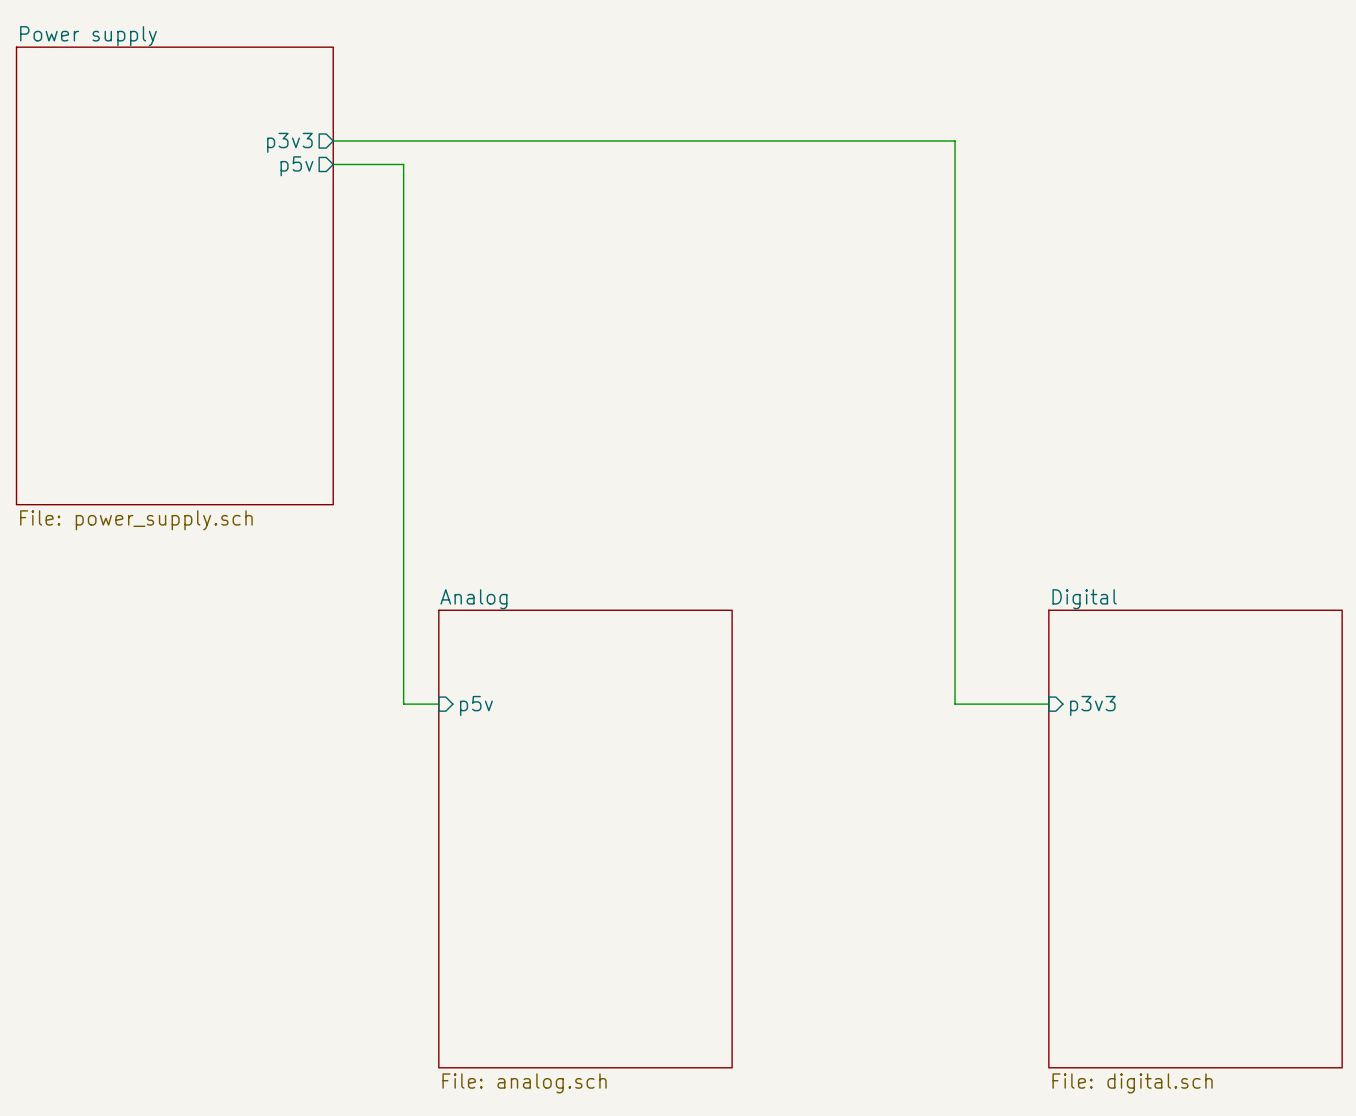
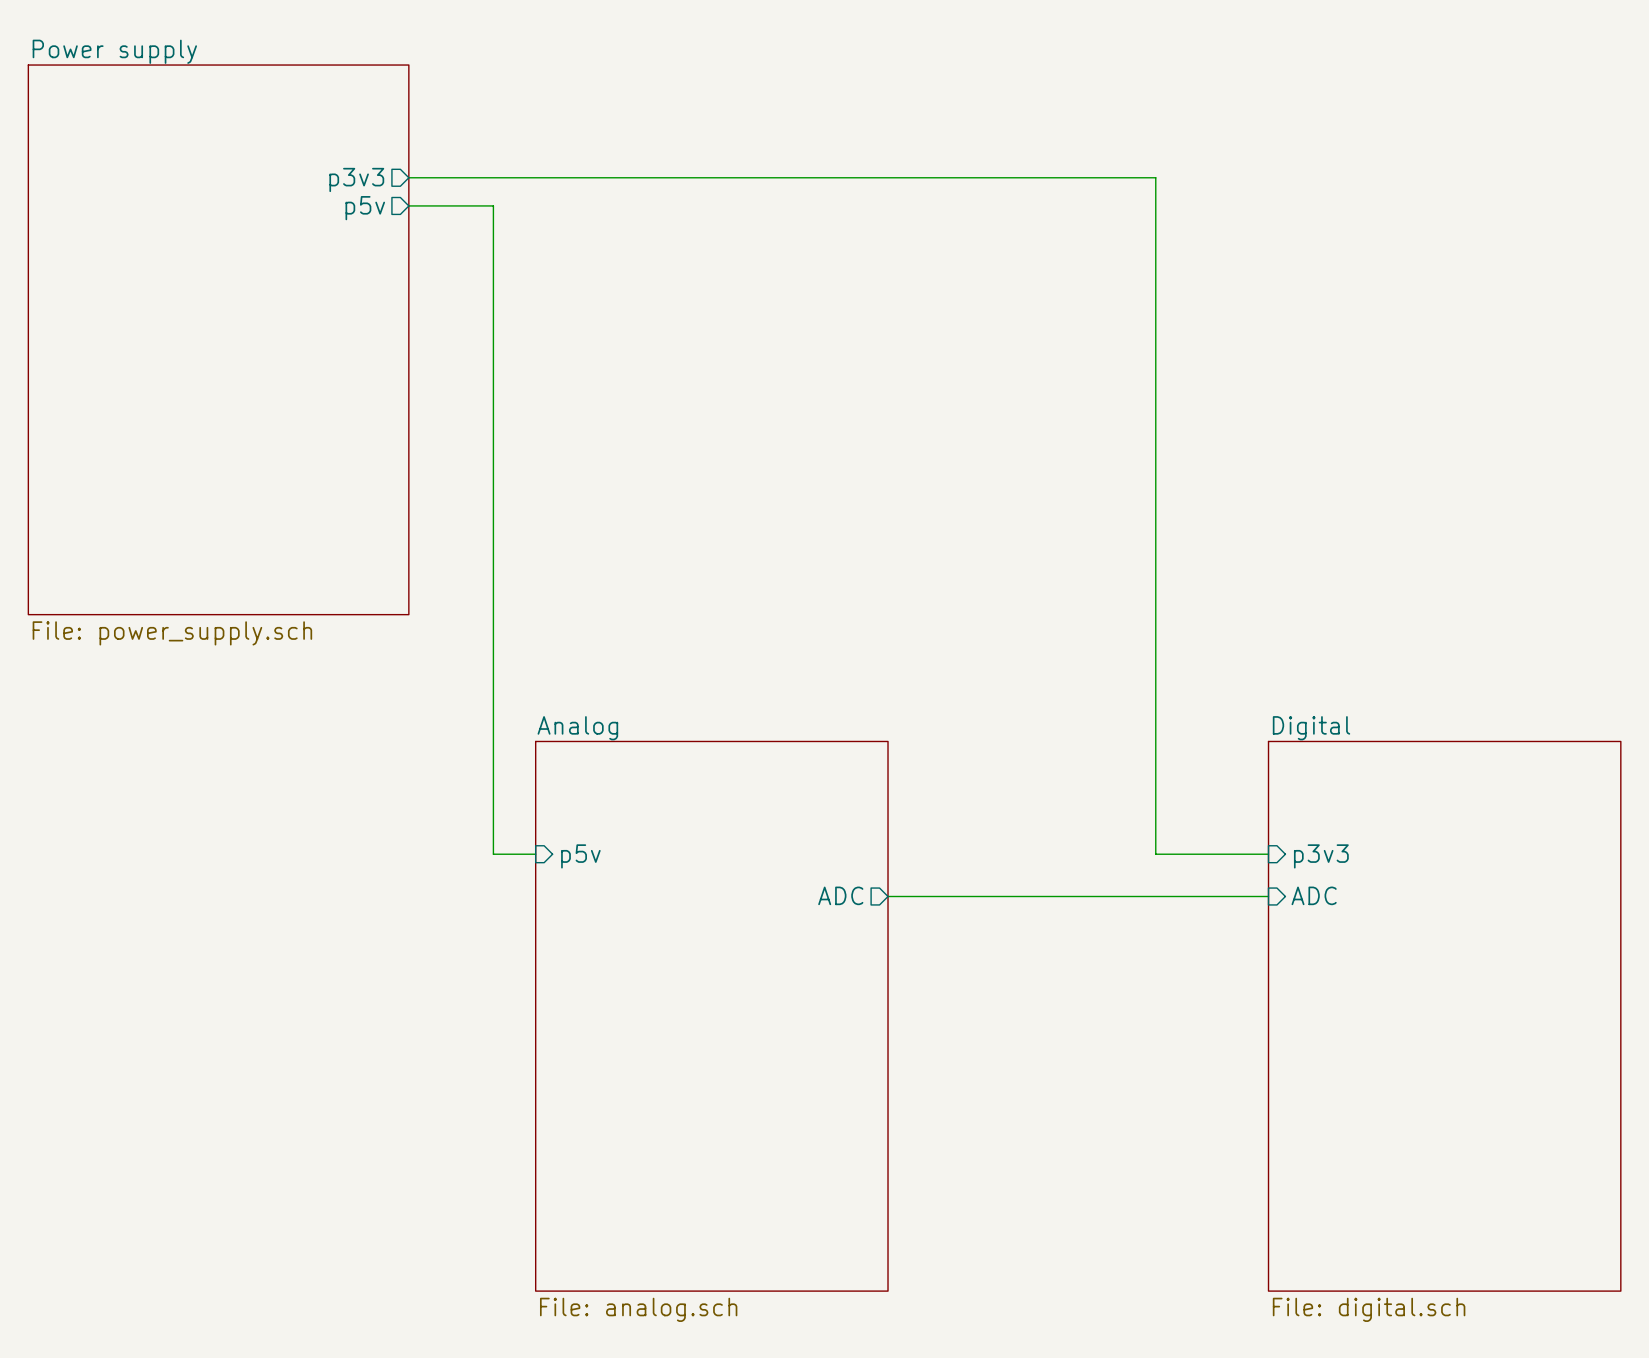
sheet pin: none -> ADC (840, 895)
sheet pin: none -> ADC (1314, 895)
wire: none -> (888, 896) (1268, 896)

